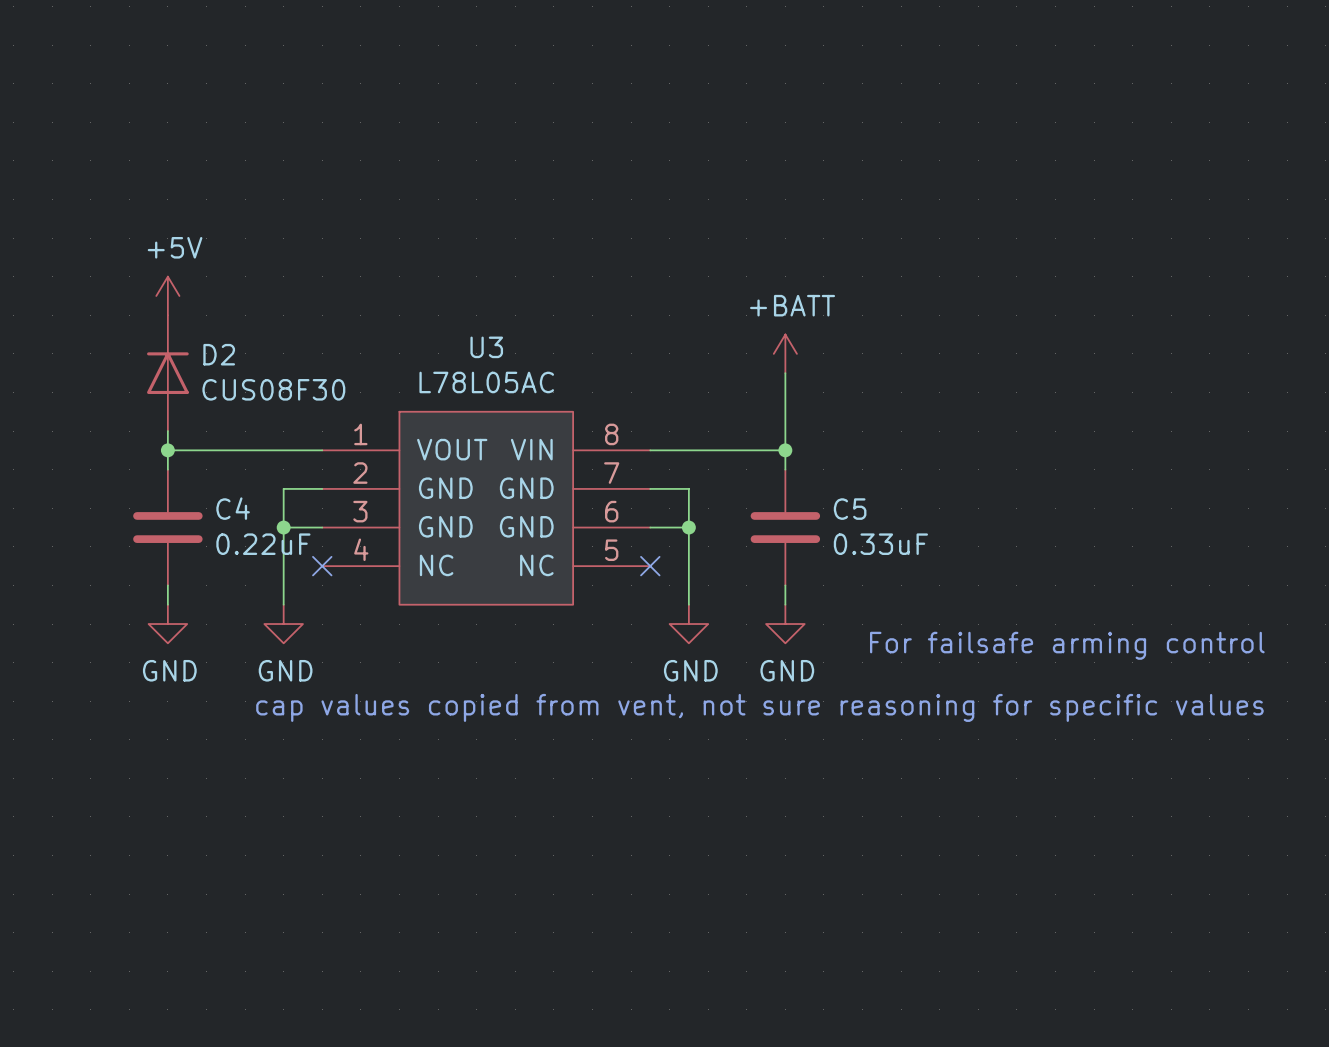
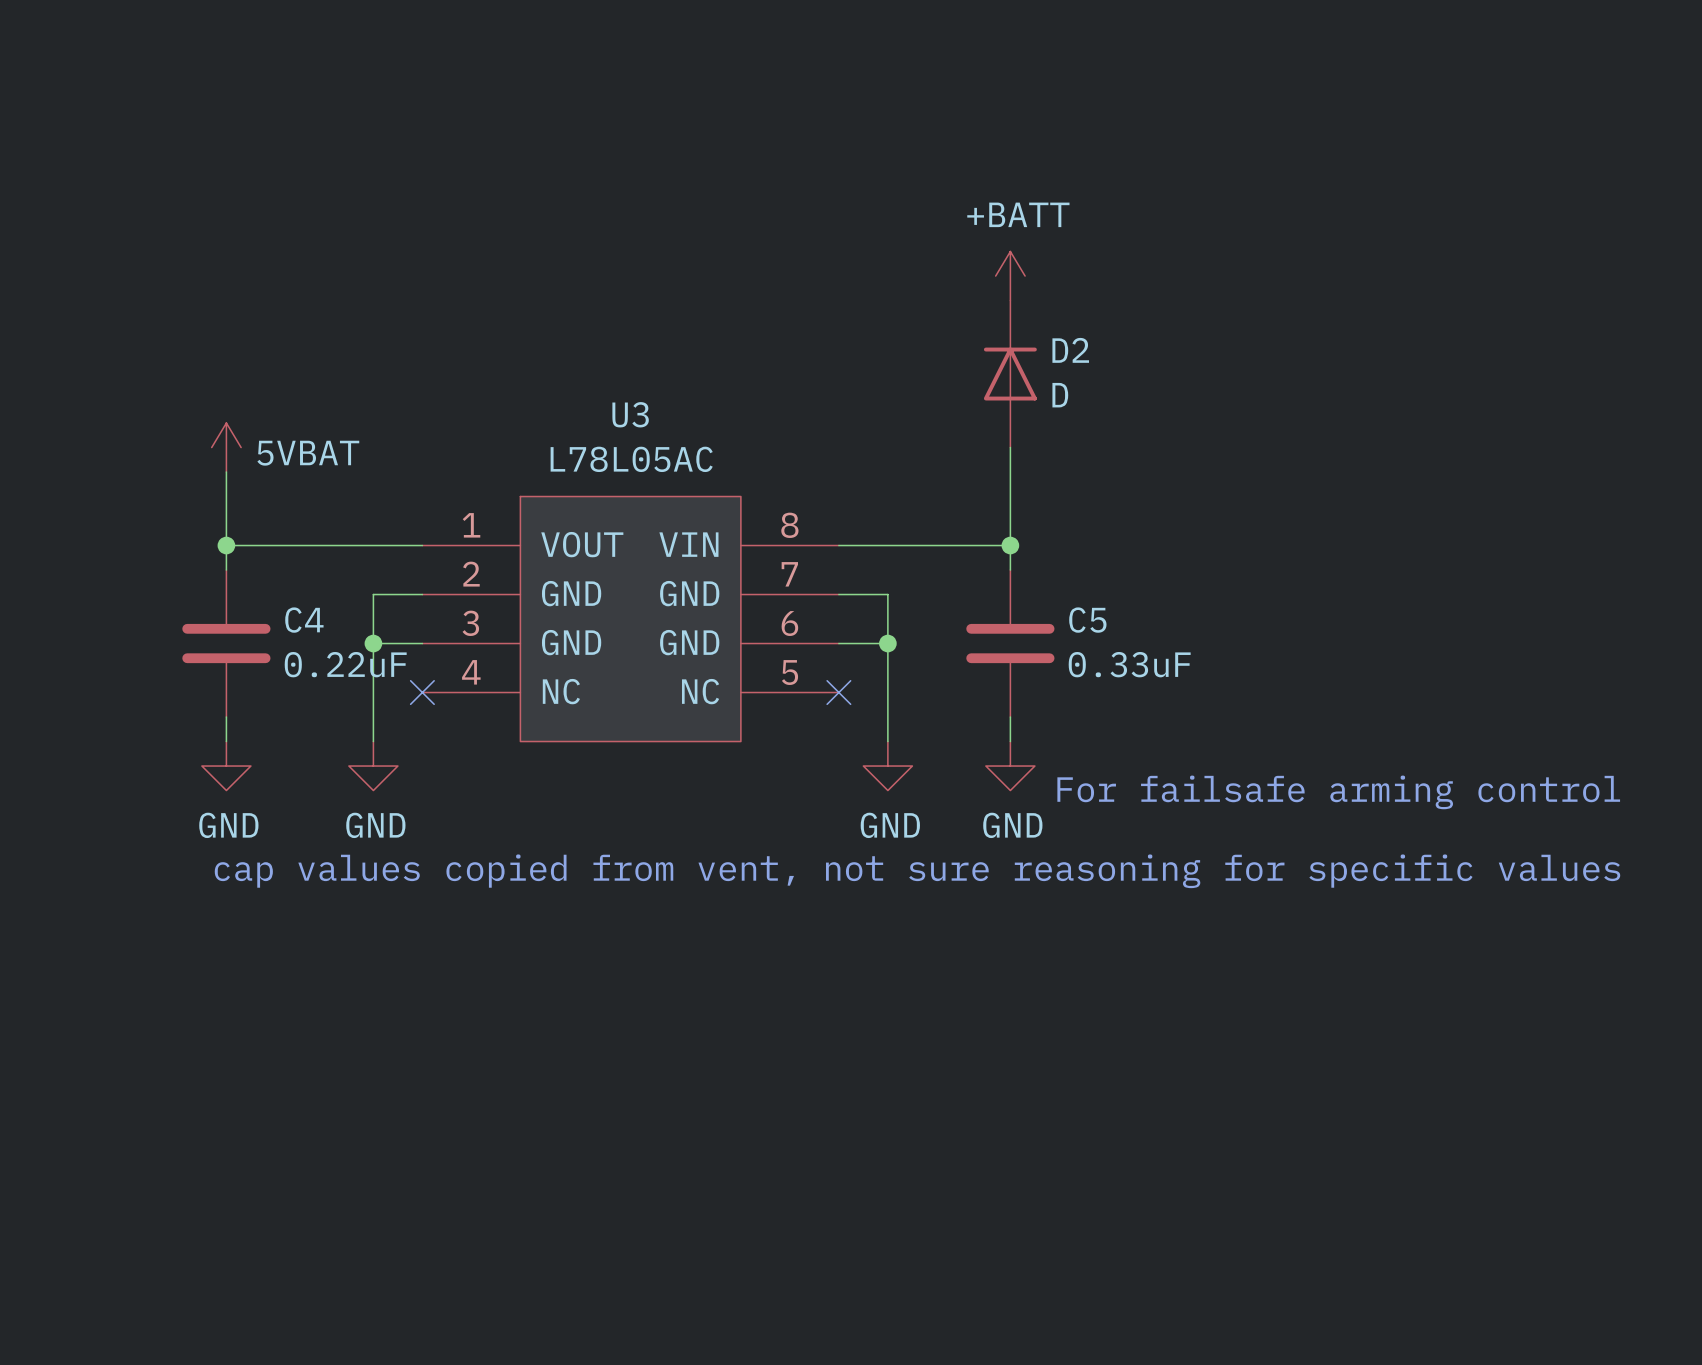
power symbol: +5V (167, 295) -> none
power symbol position: +BATT (785, 353) -> +BATT (1010, 276)
power symbol: none -> 5VBAT (226, 447)
D2 position: (167, 373) -> (1010, 374)
D2 value: CUS08F30 (273, 389) -> D (1060, 395)

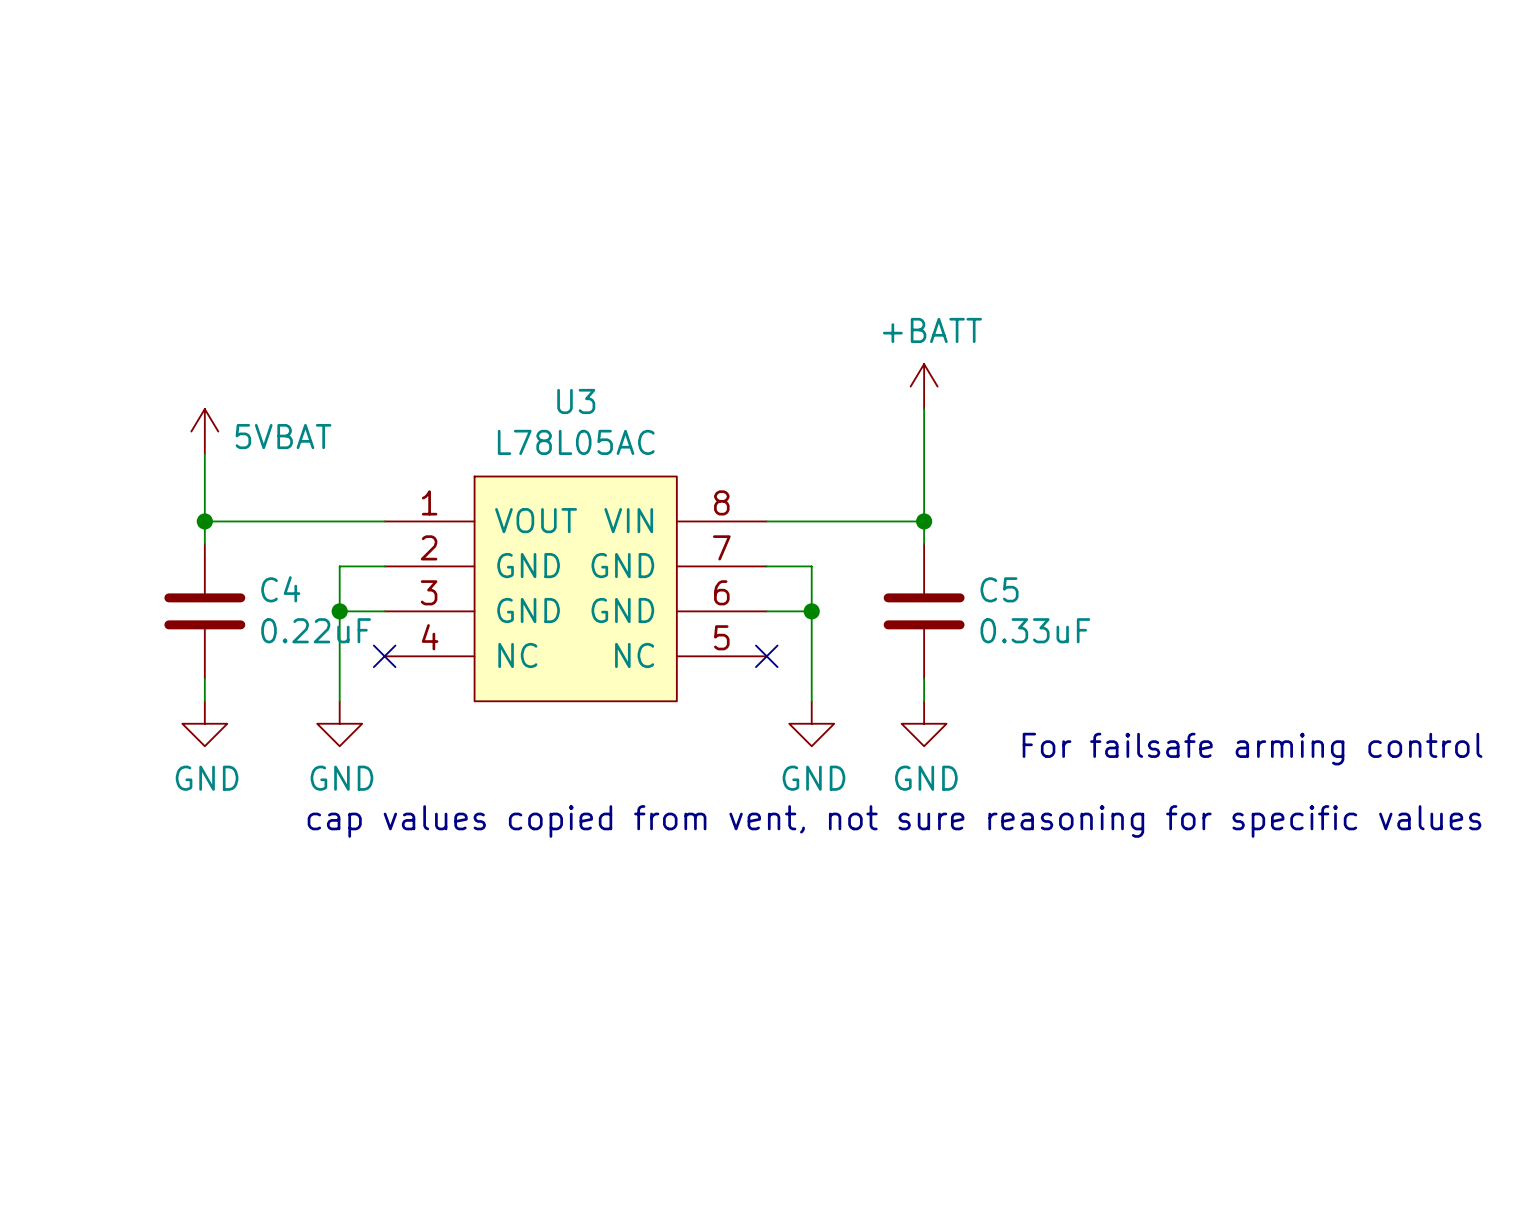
power symbol position: +BATT (1010, 276) -> +BATT (924, 386)
D2: D (1010, 374) -> none

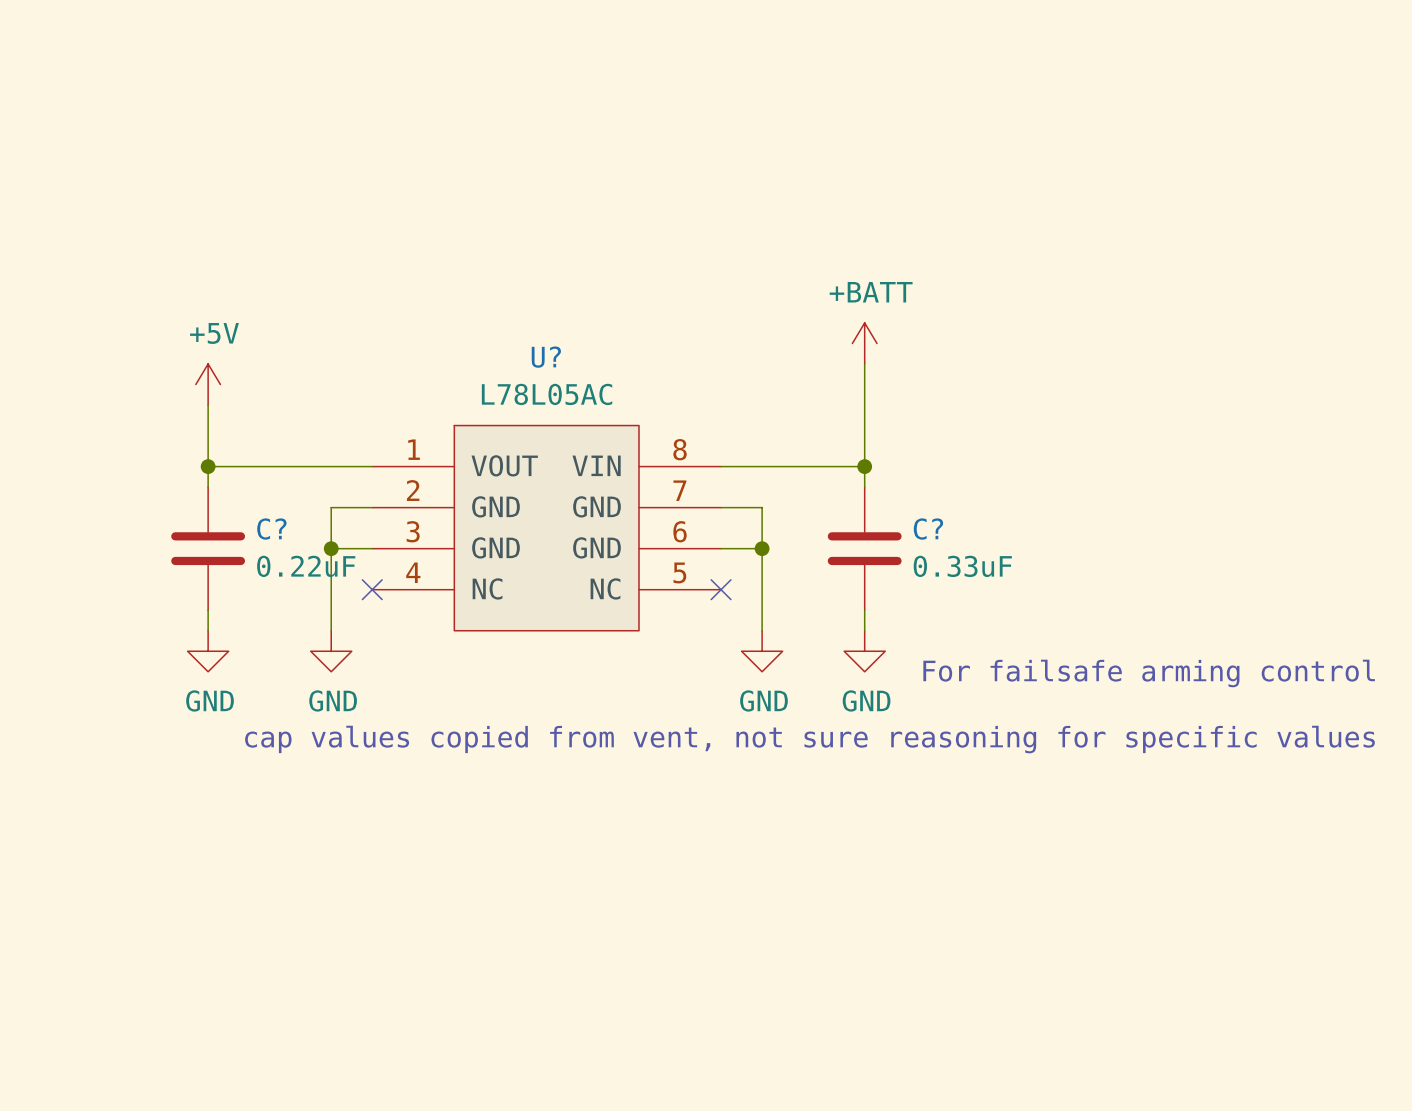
U3 name: U3 (576, 401) -> U? (546, 357)
power symbol: 5VBAT (204, 431) -> +5V (208, 384)
C4 name: C4 (280, 589) -> C? (271, 529)
C5 name: C5 (999, 589) -> C? (928, 529)

